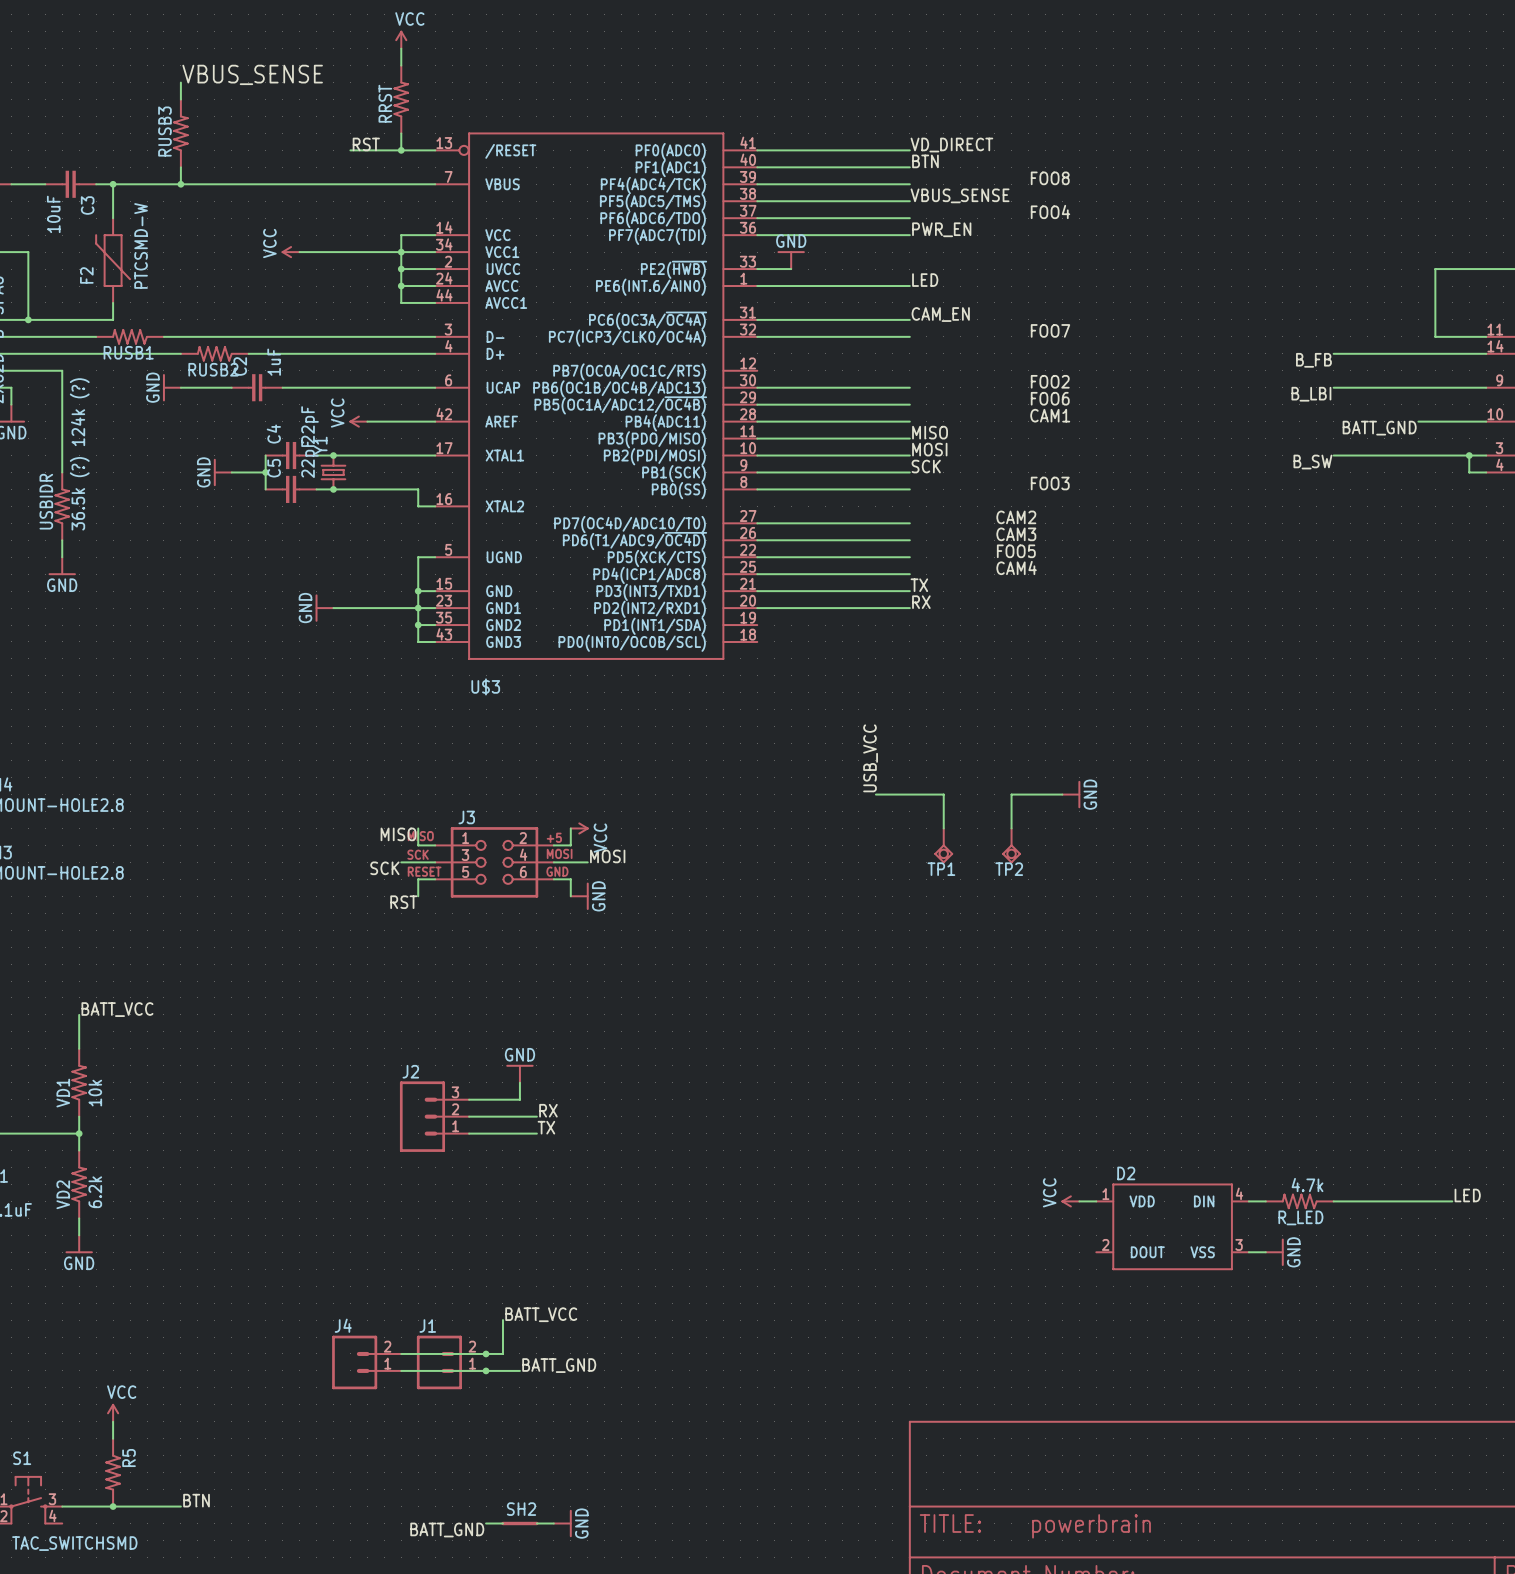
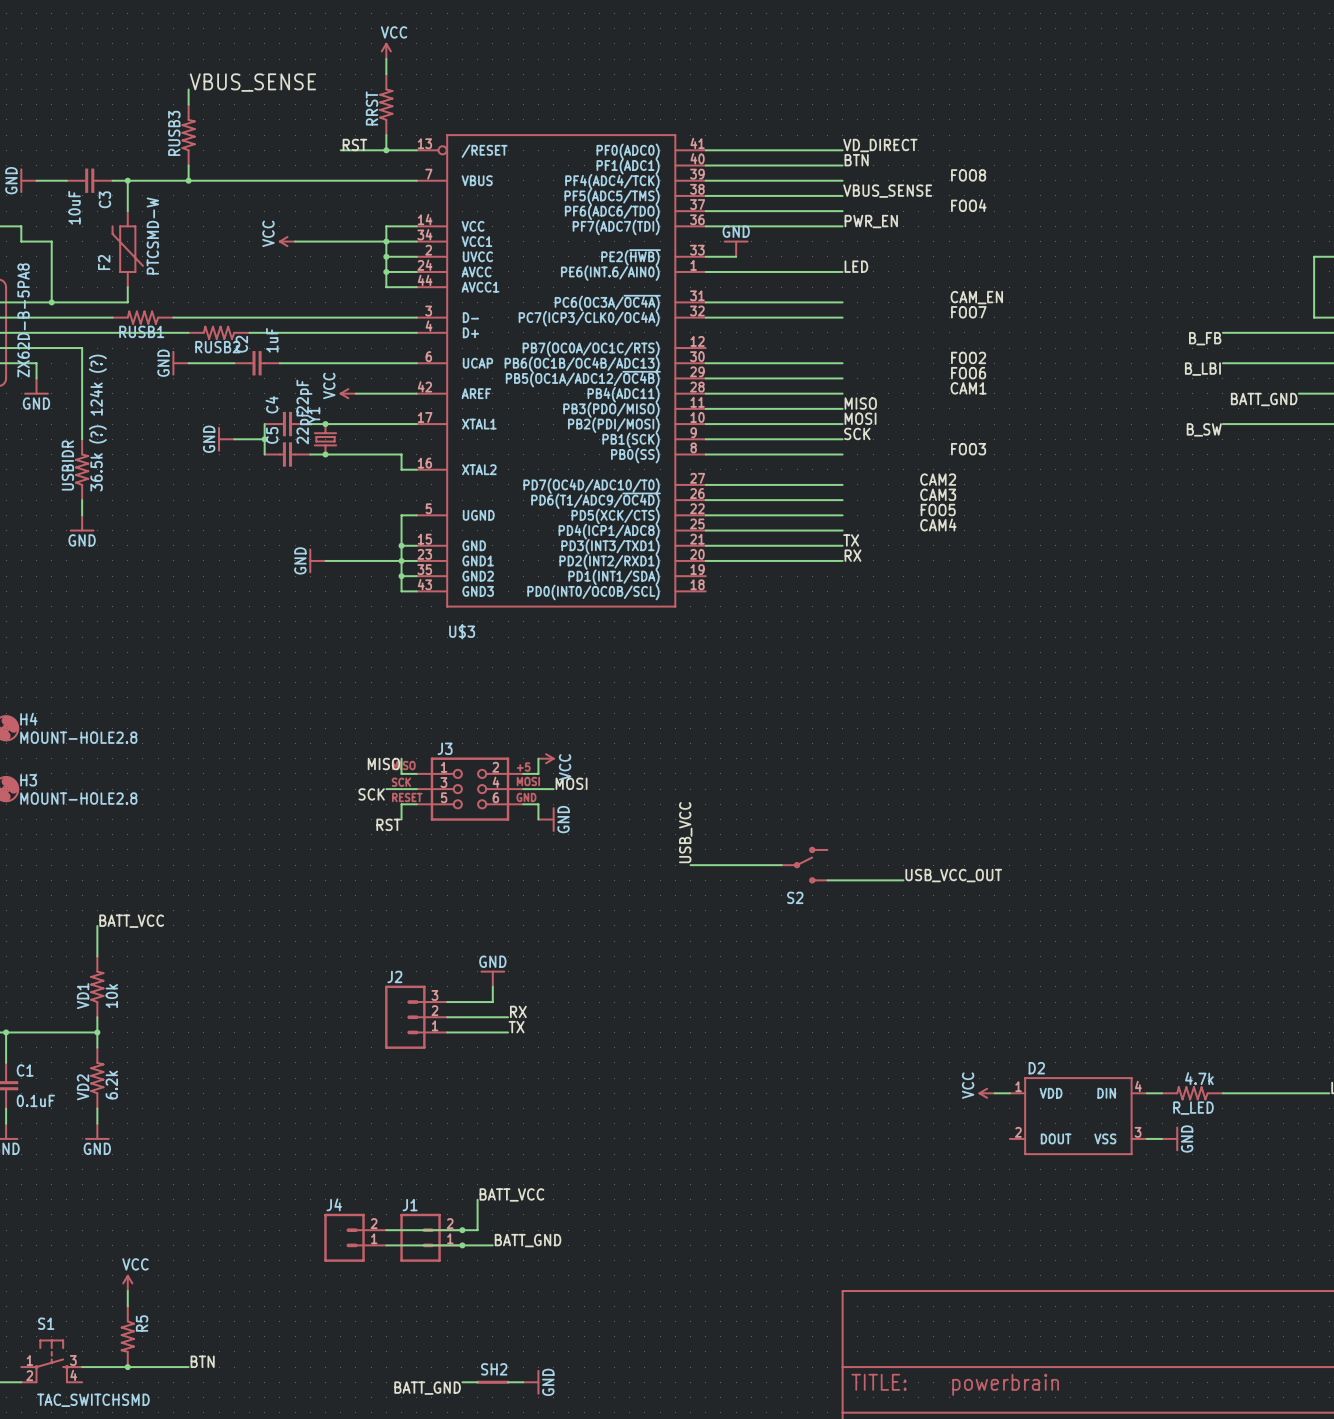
label position: CAM_EN (940, 314) -> CAM_EN (976, 297)
label: USB_VCC (870, 758) -> none
wire: (875, 794) (943, 794) (943, 828) -> none
wire: (1062, 794) (1011, 794) (1011, 828) -> none
power symbol: GND (1071, 794) -> none
TP1: (943, 845) -> none
TP2: (1011, 845) -> none
label: none -> USB_VCC (685, 832)
wire: none -> (690, 865) (781, 865)
S2: none -> (804, 865)
label: none -> USB_VCC_OUT (953, 875)
wire: none -> (827, 880) (903, 880)

